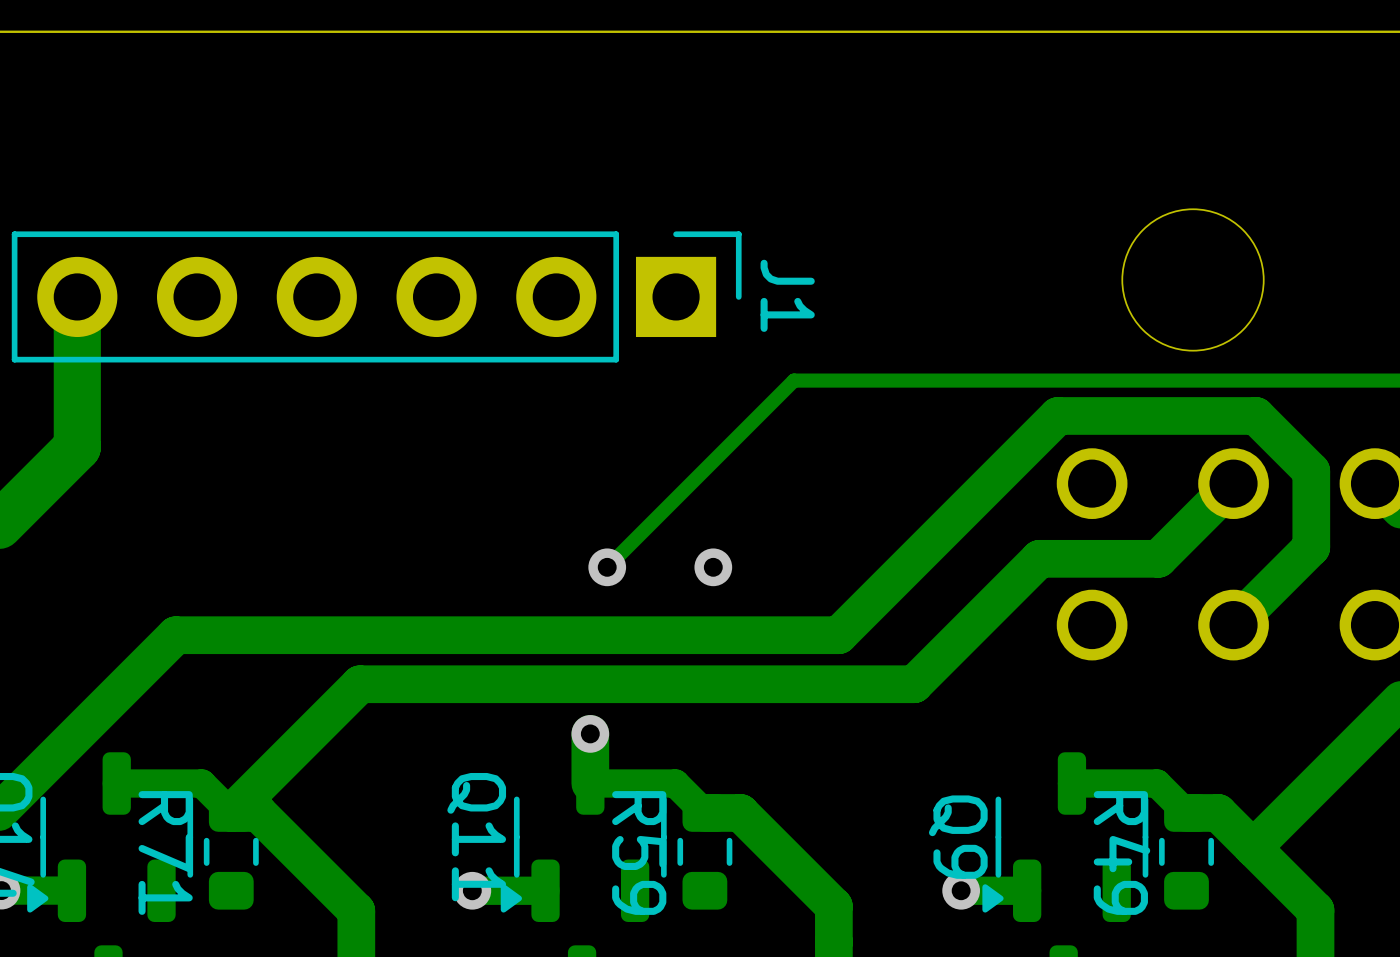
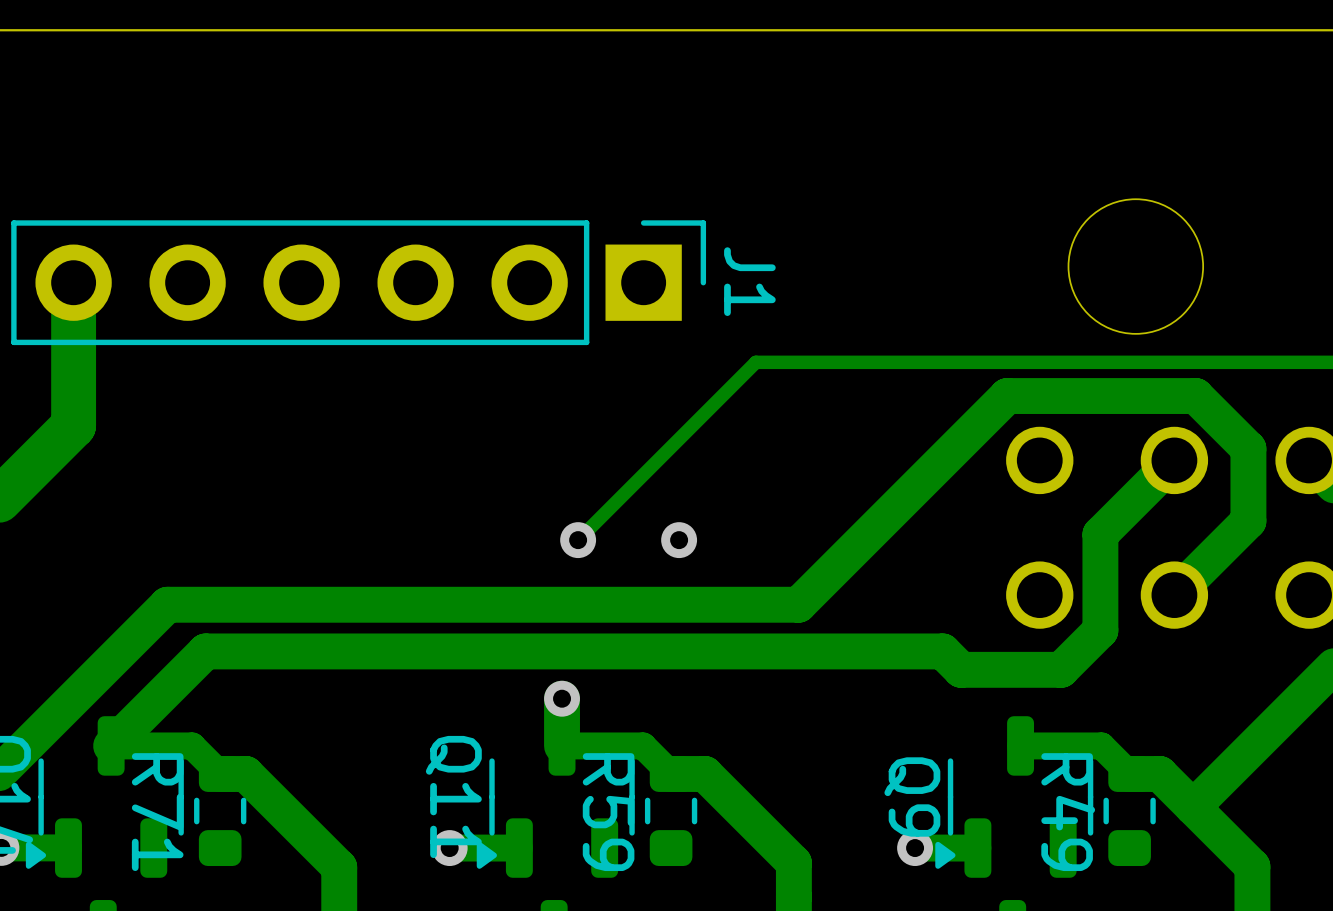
track: (1158, 558) (1039, 558) (914, 684) -> (1102, 532) (1100, 534) (1100, 630) (1061, 669) (961, 669) (942, 651) (870, 651)
track: (360, 684) (231, 812) -> (342, 651) (205, 651) (111, 745)

